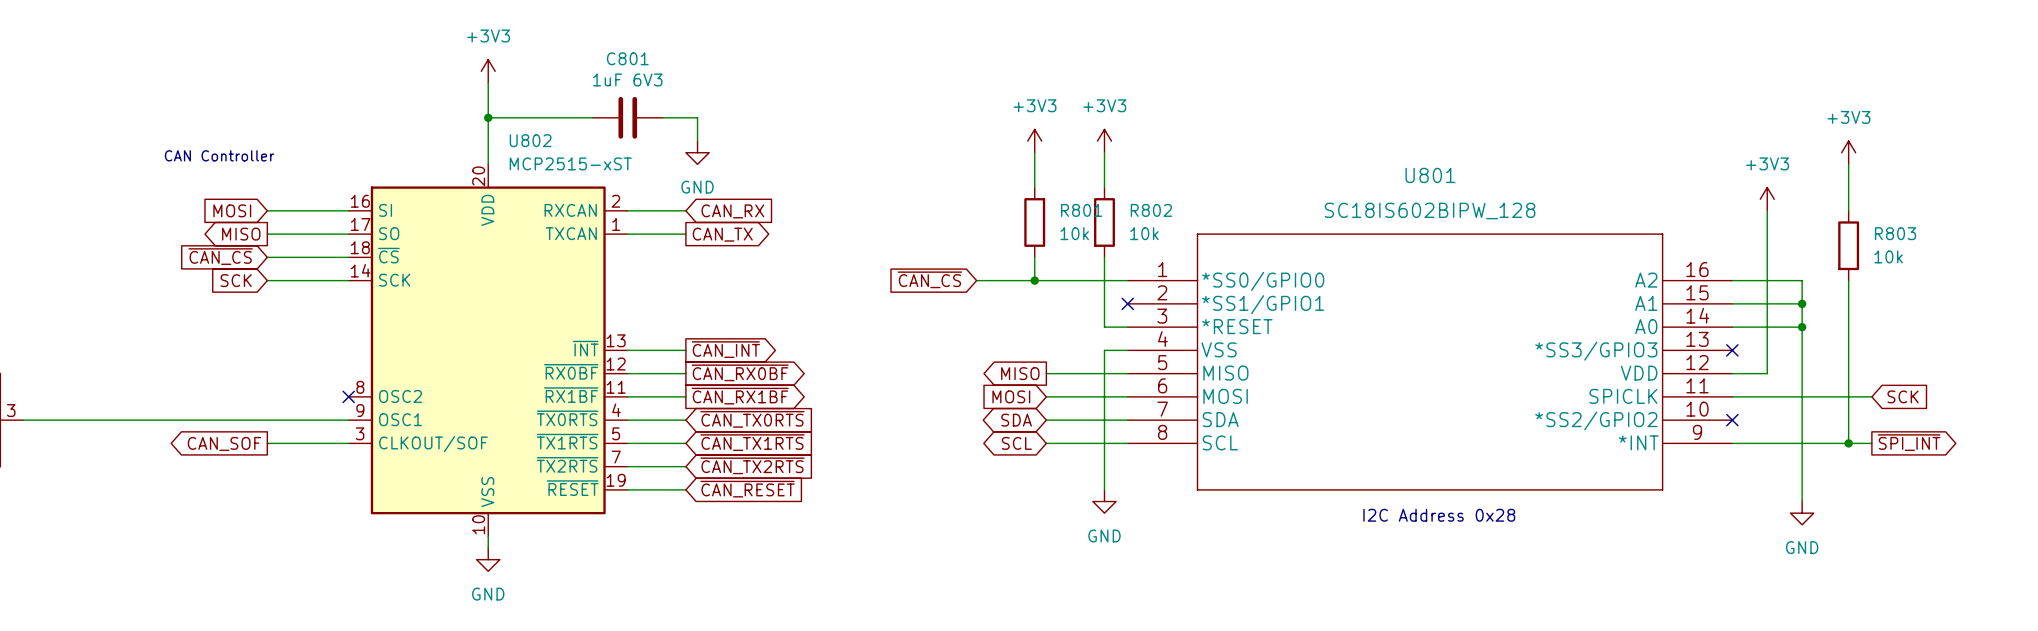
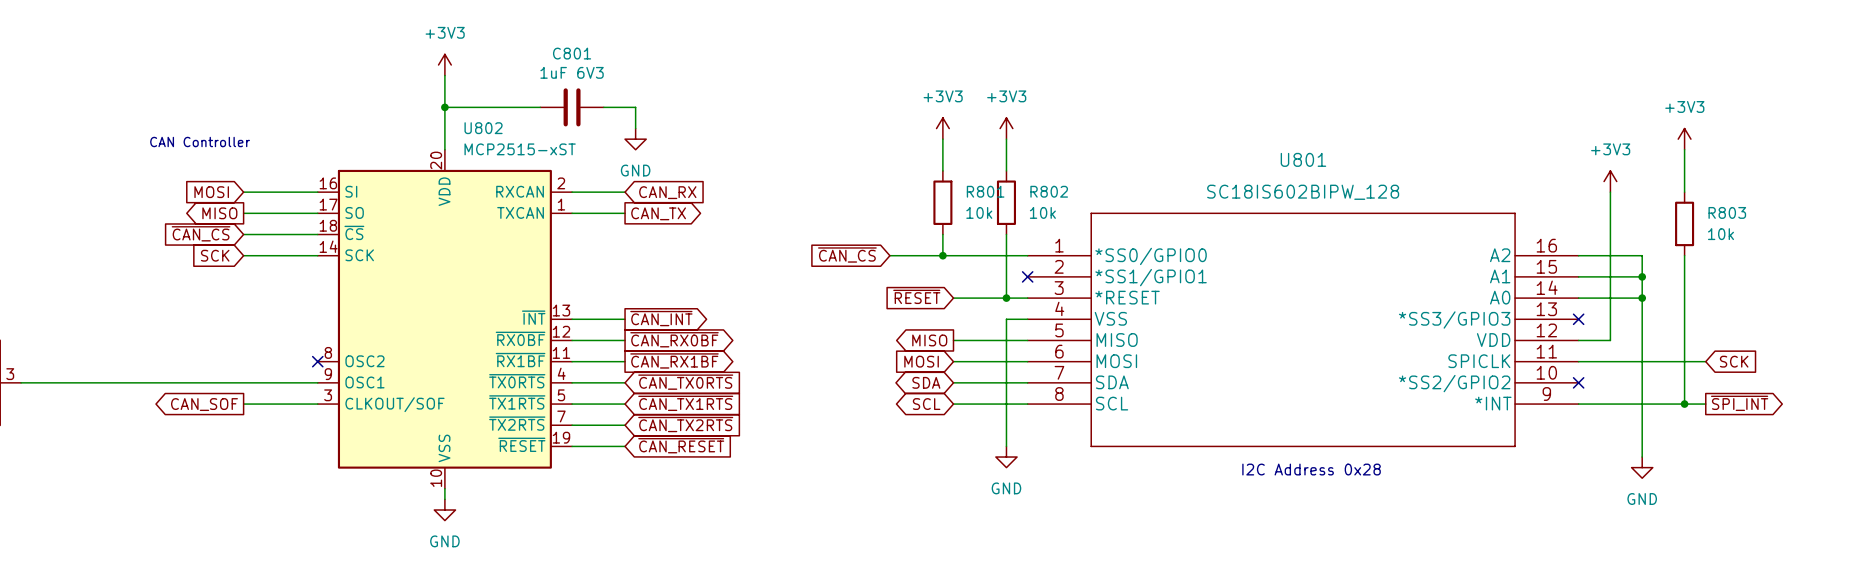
global label: none -> ~{RESET} (916, 296)
wire: none -> (953, 298) (1006, 298)
junction: none -> (1006, 298)

